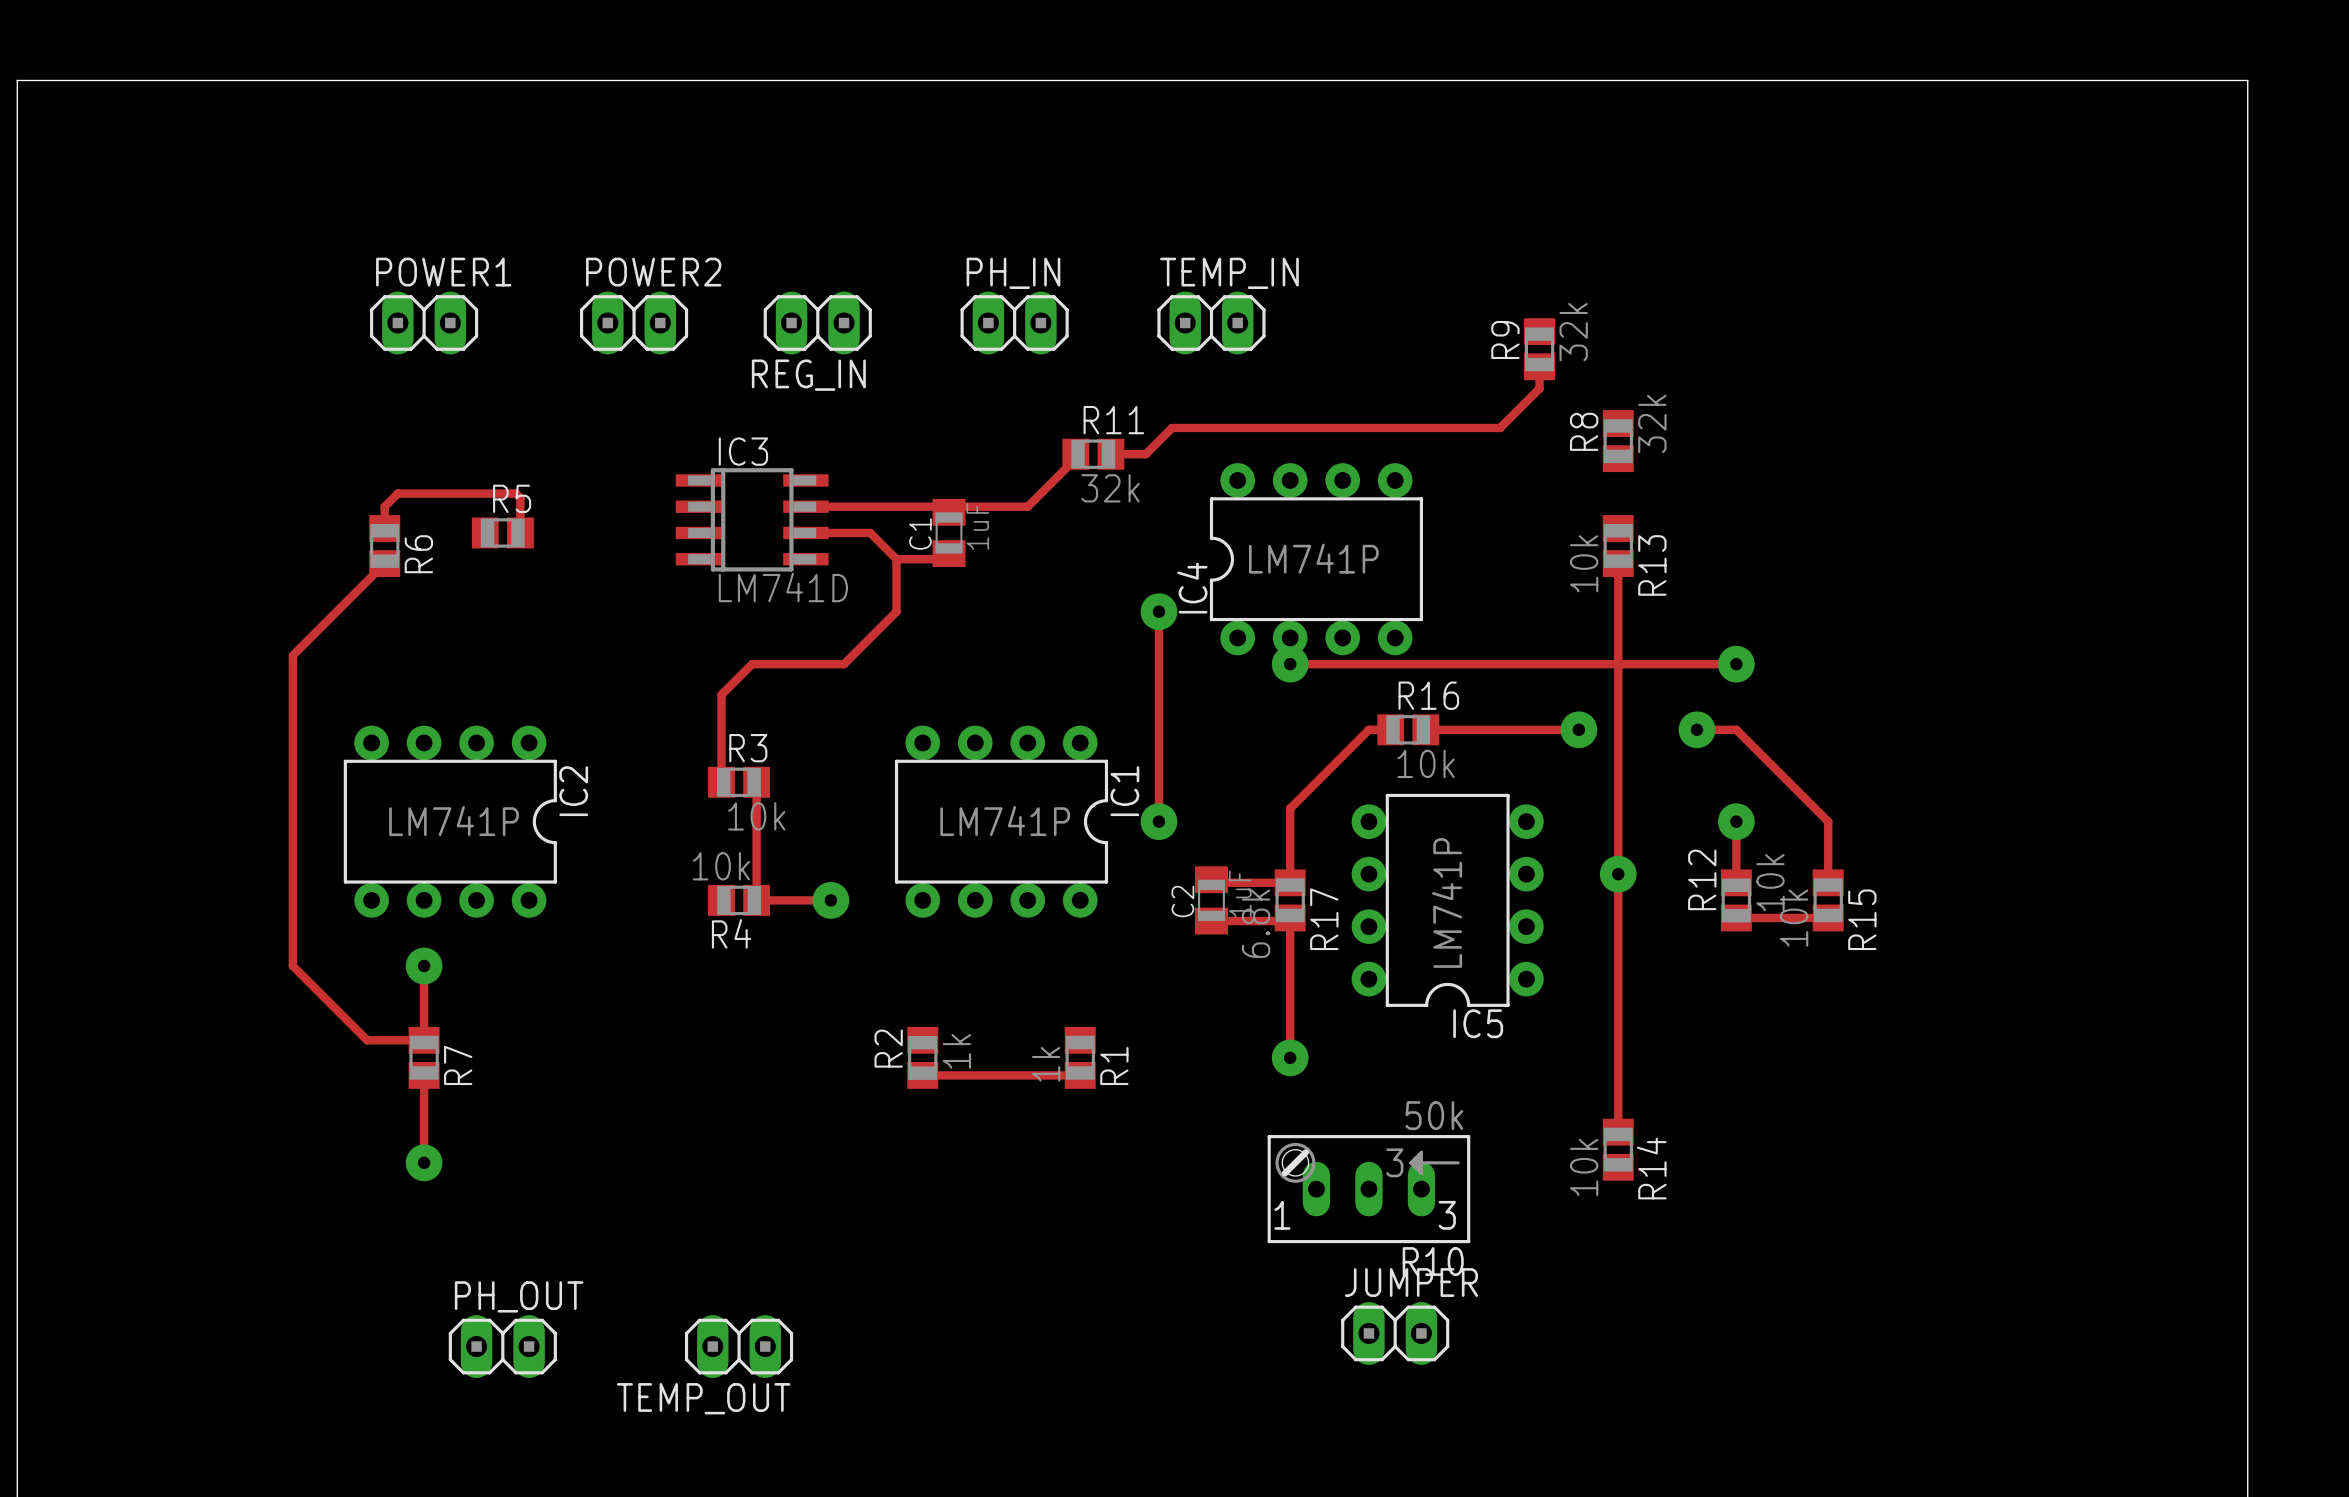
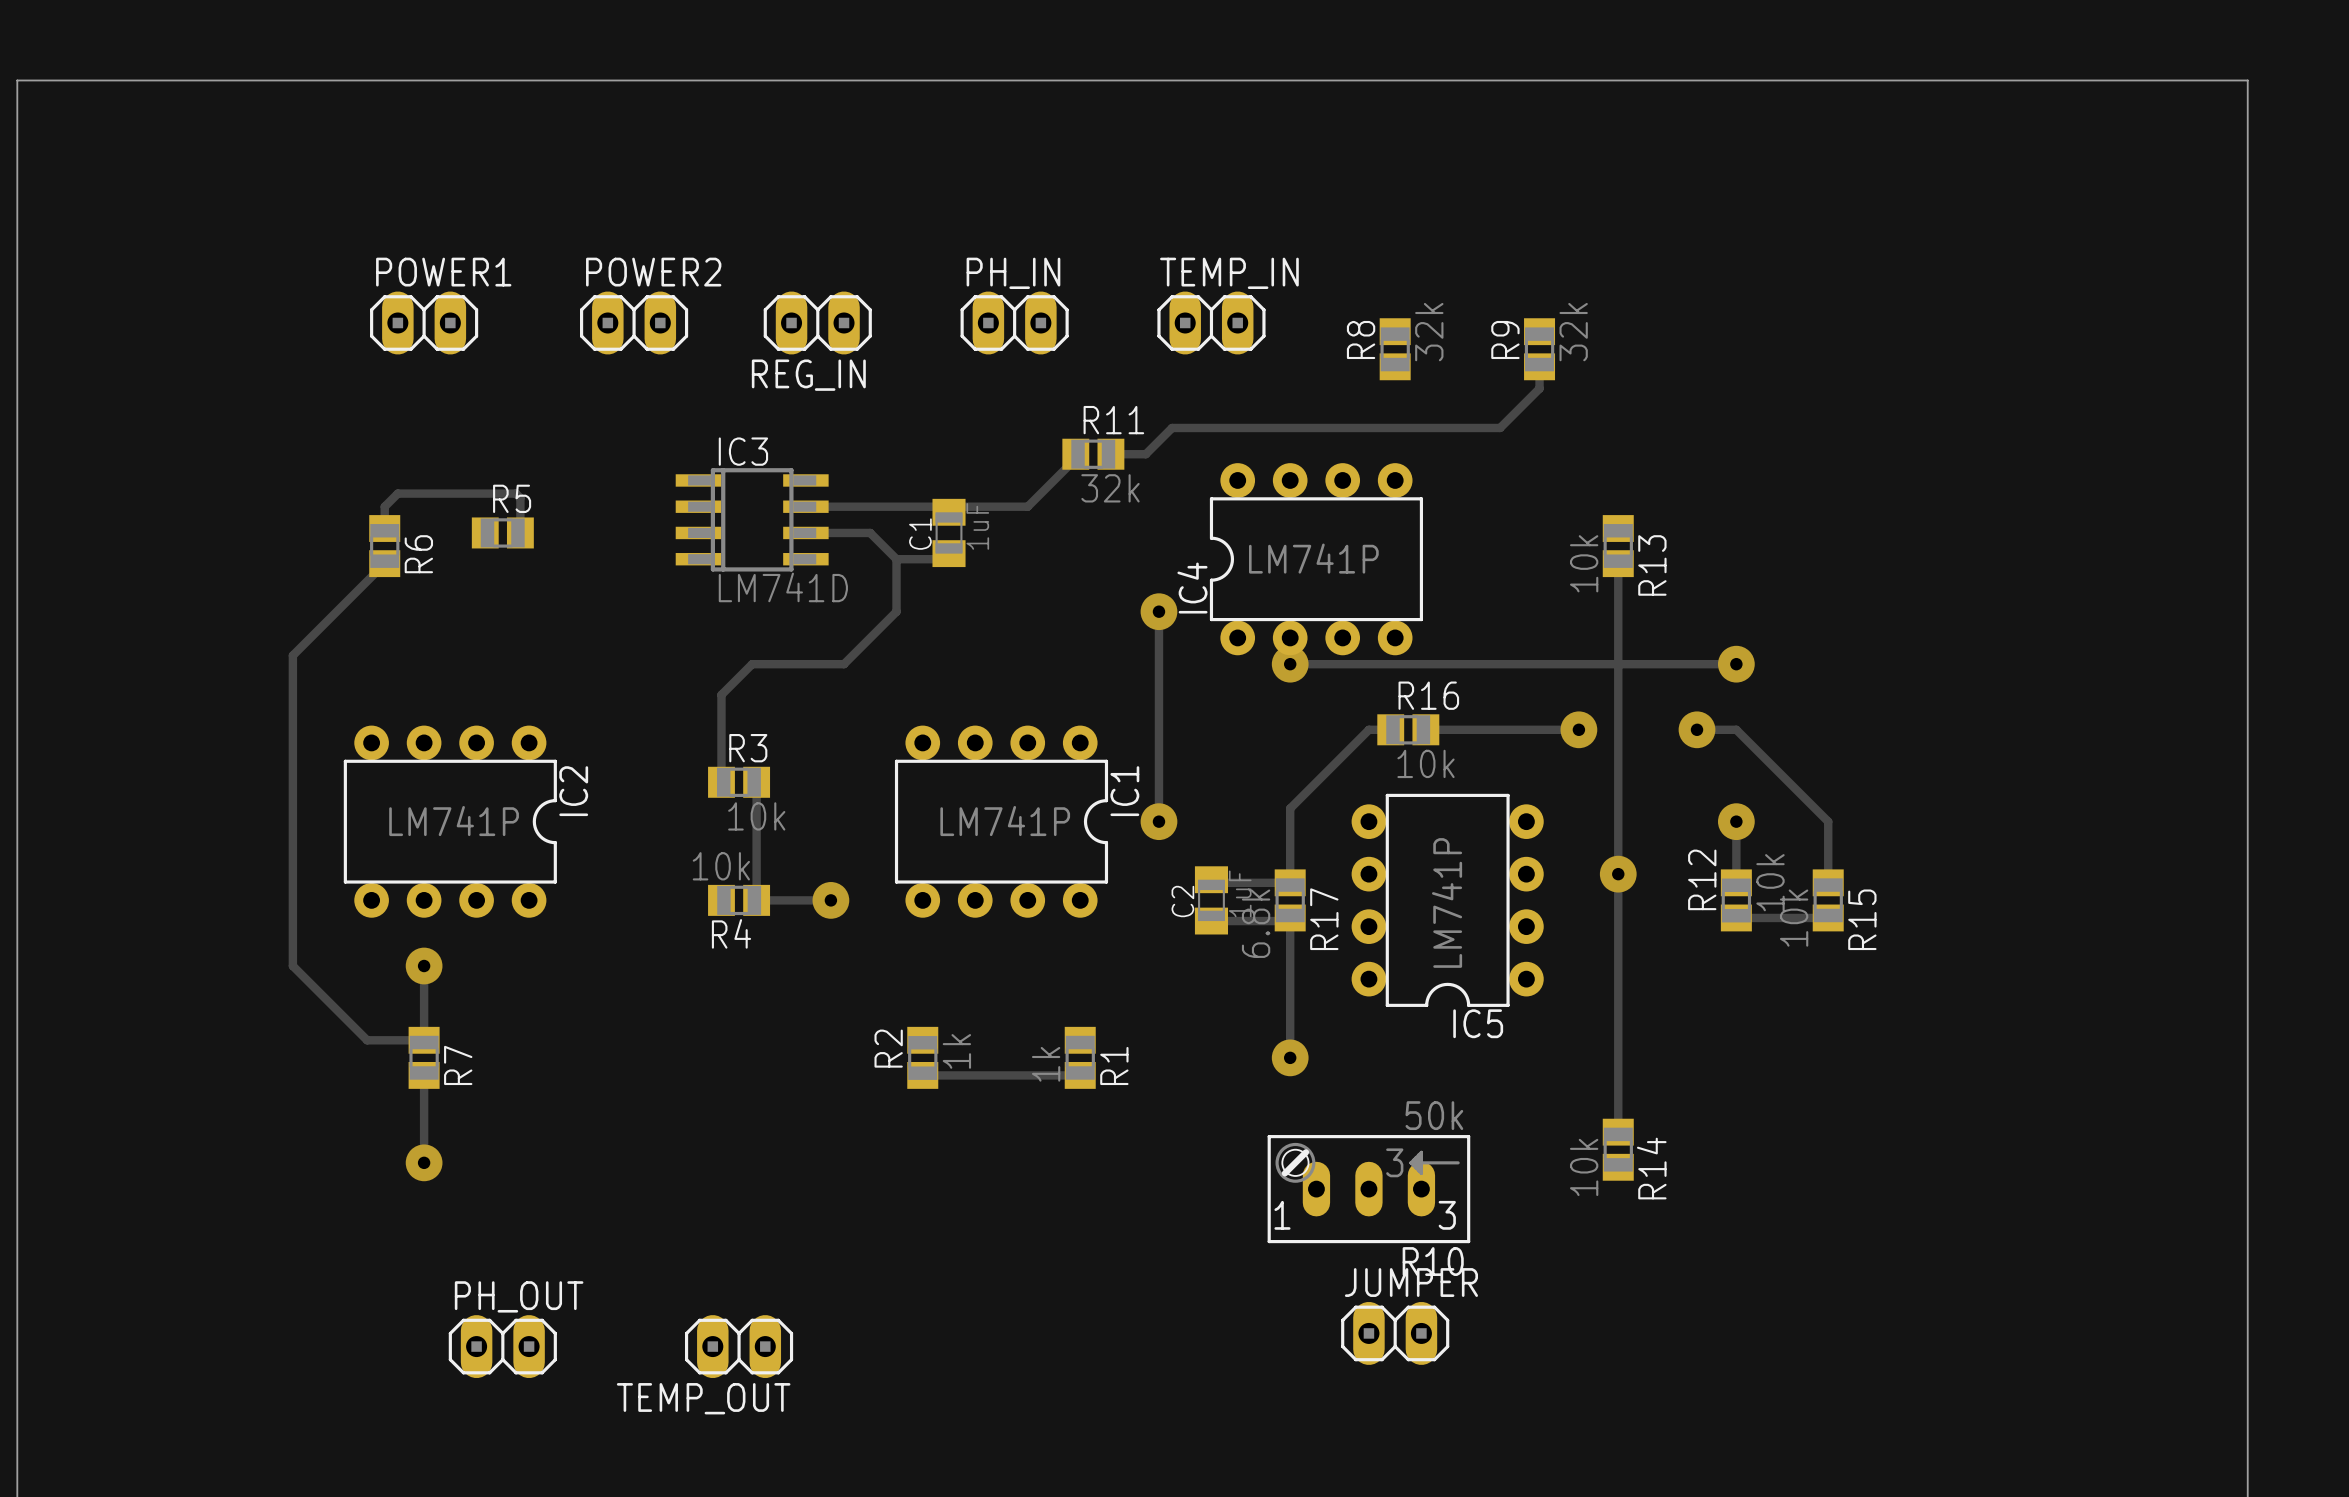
R8 position: (1618, 441) -> (1395, 349)

